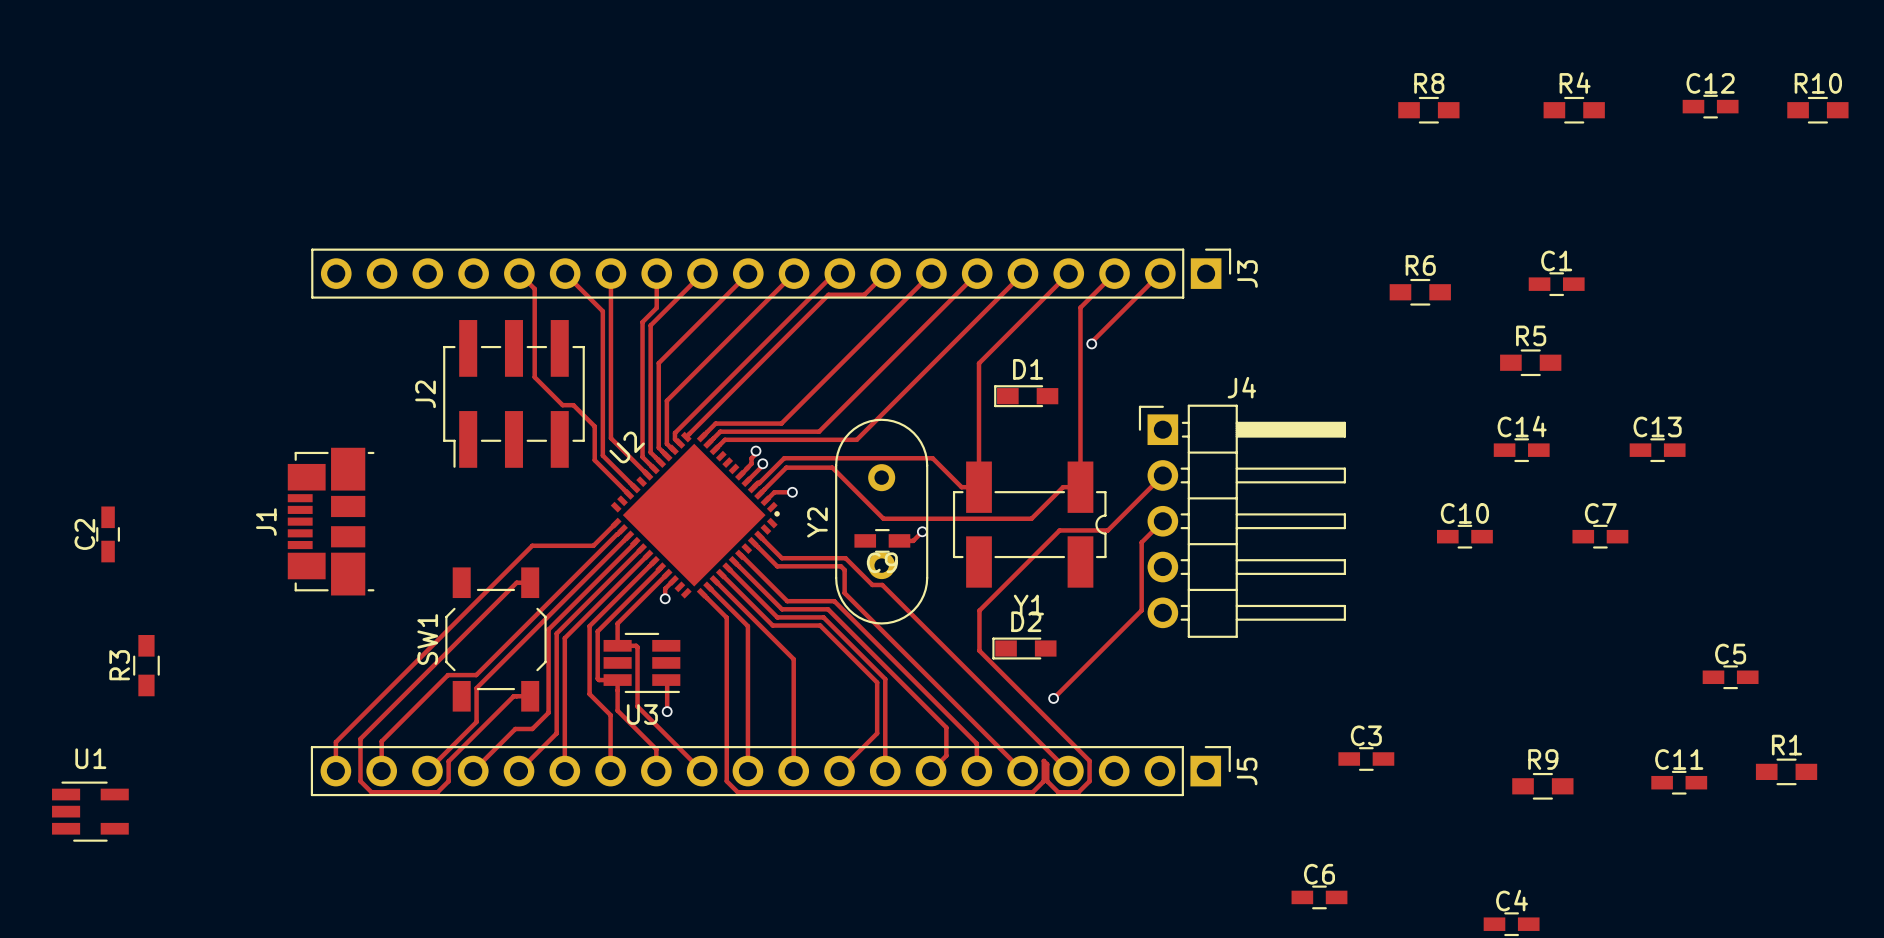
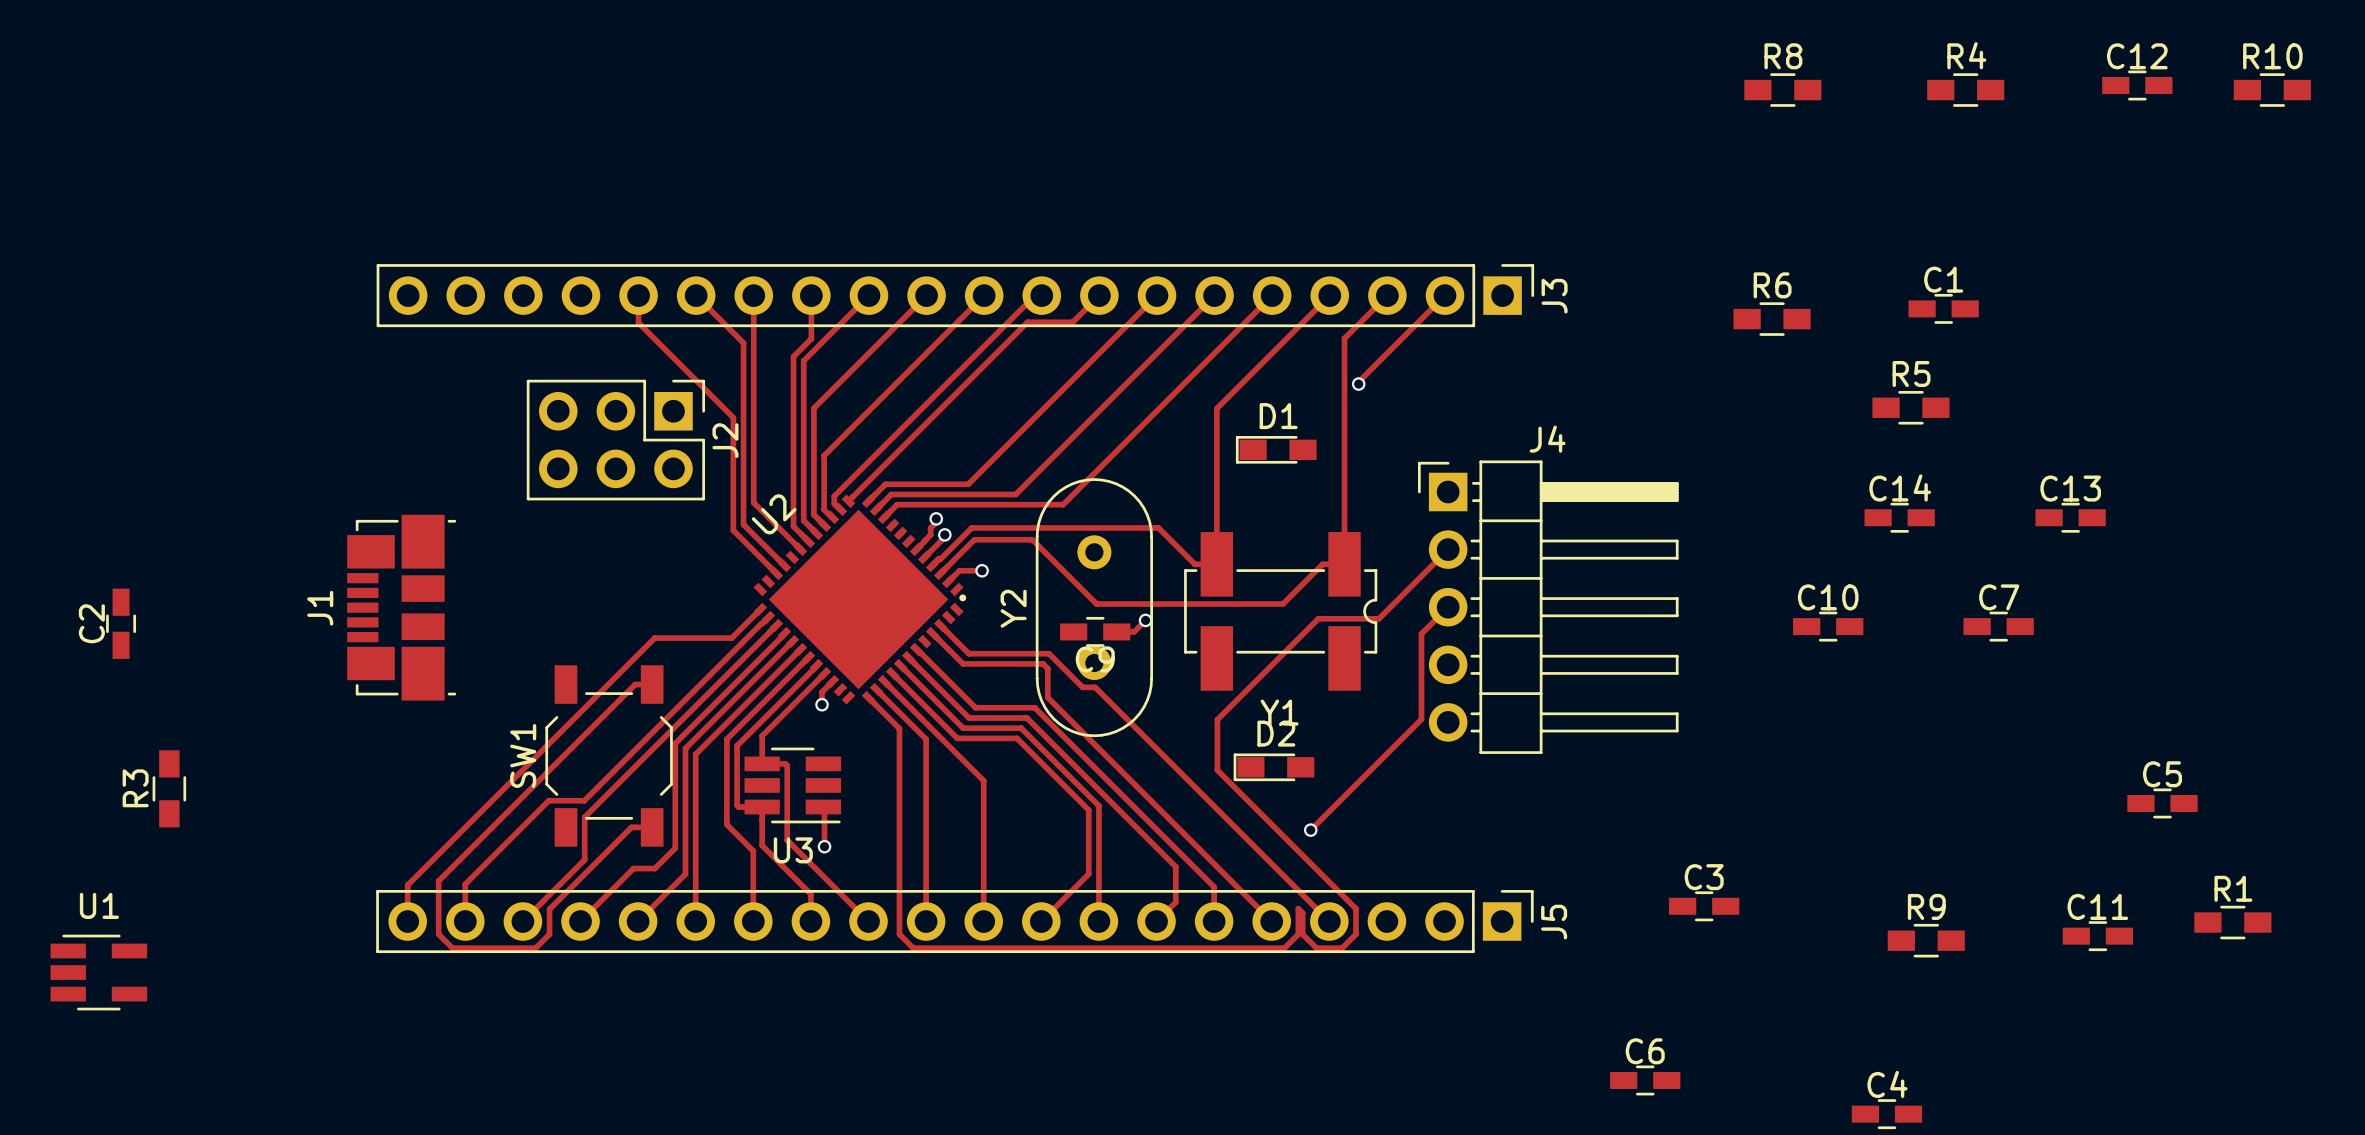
track: (519, 273) (534, 288) (534, 377) (562, 405) (573, 405) (594, 426) -> (638, 295) (638, 322) (733, 417) (733, 487)
J2 footprint: [443, 320, 585, 468] -> [526, 379, 706, 501]
J2 name position: J2 (425, 394) -> J2 (725, 440)

